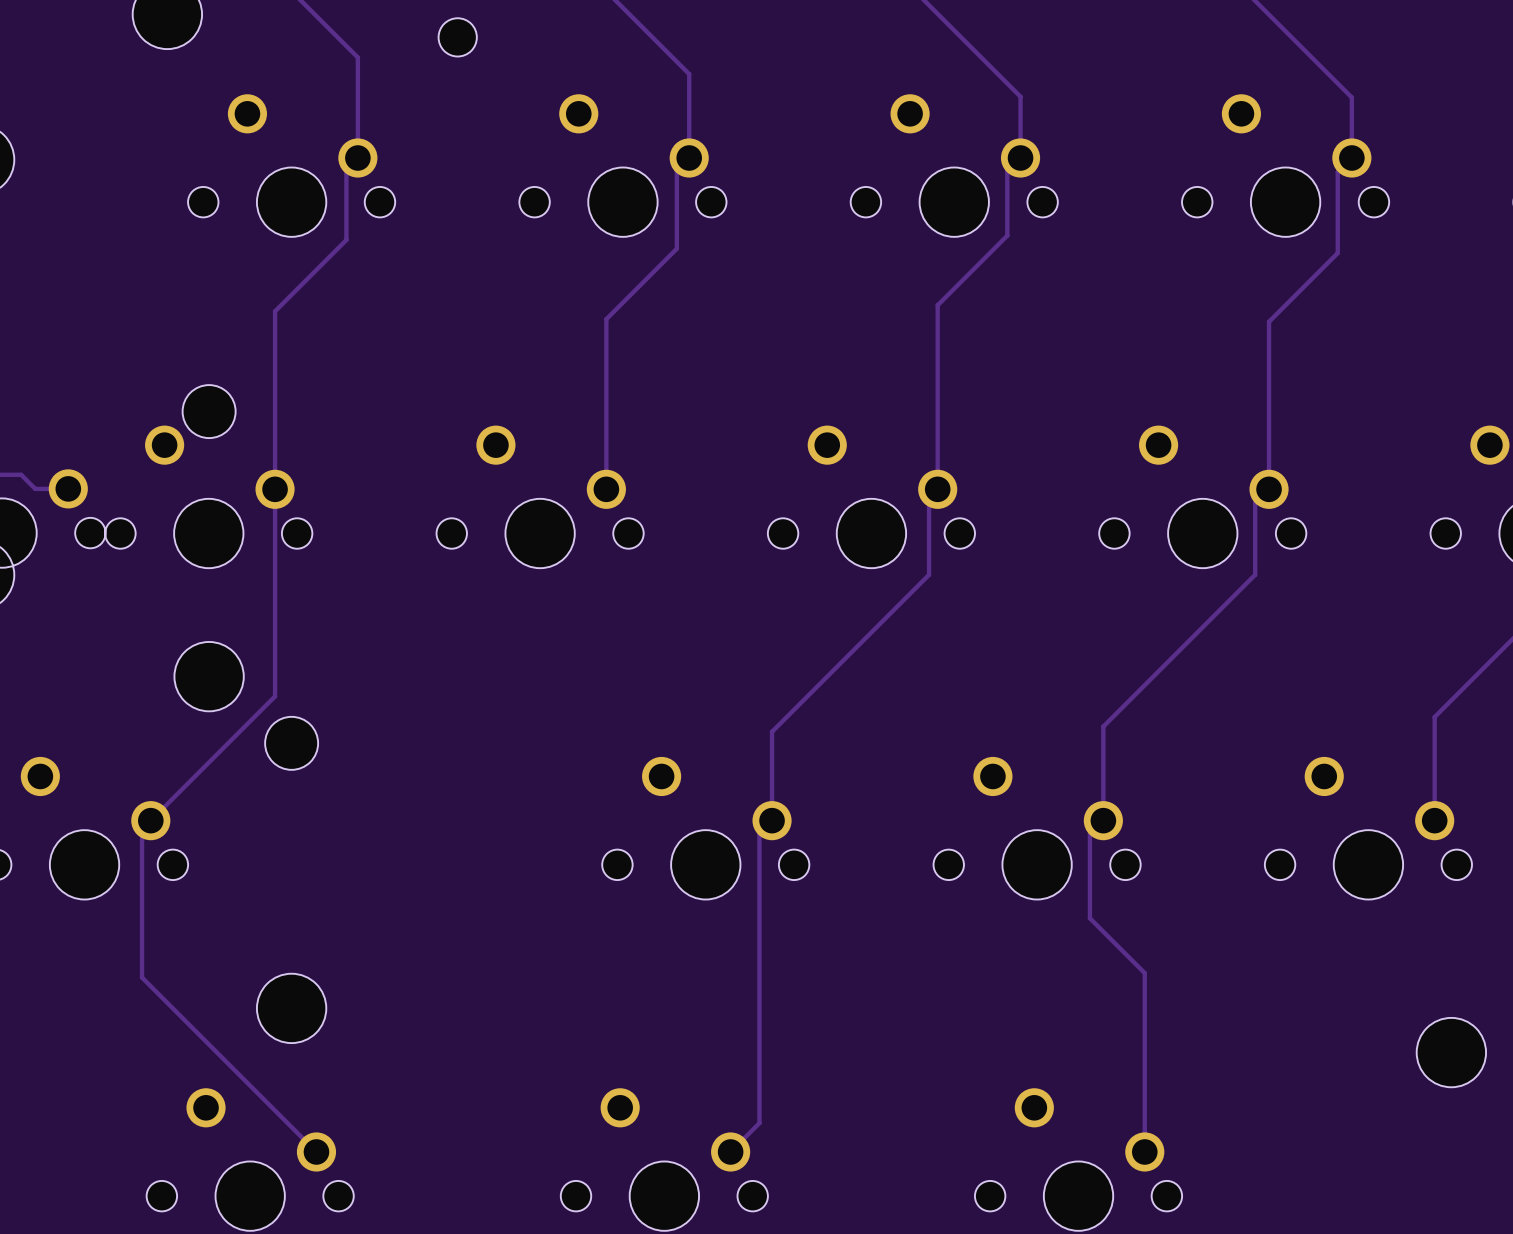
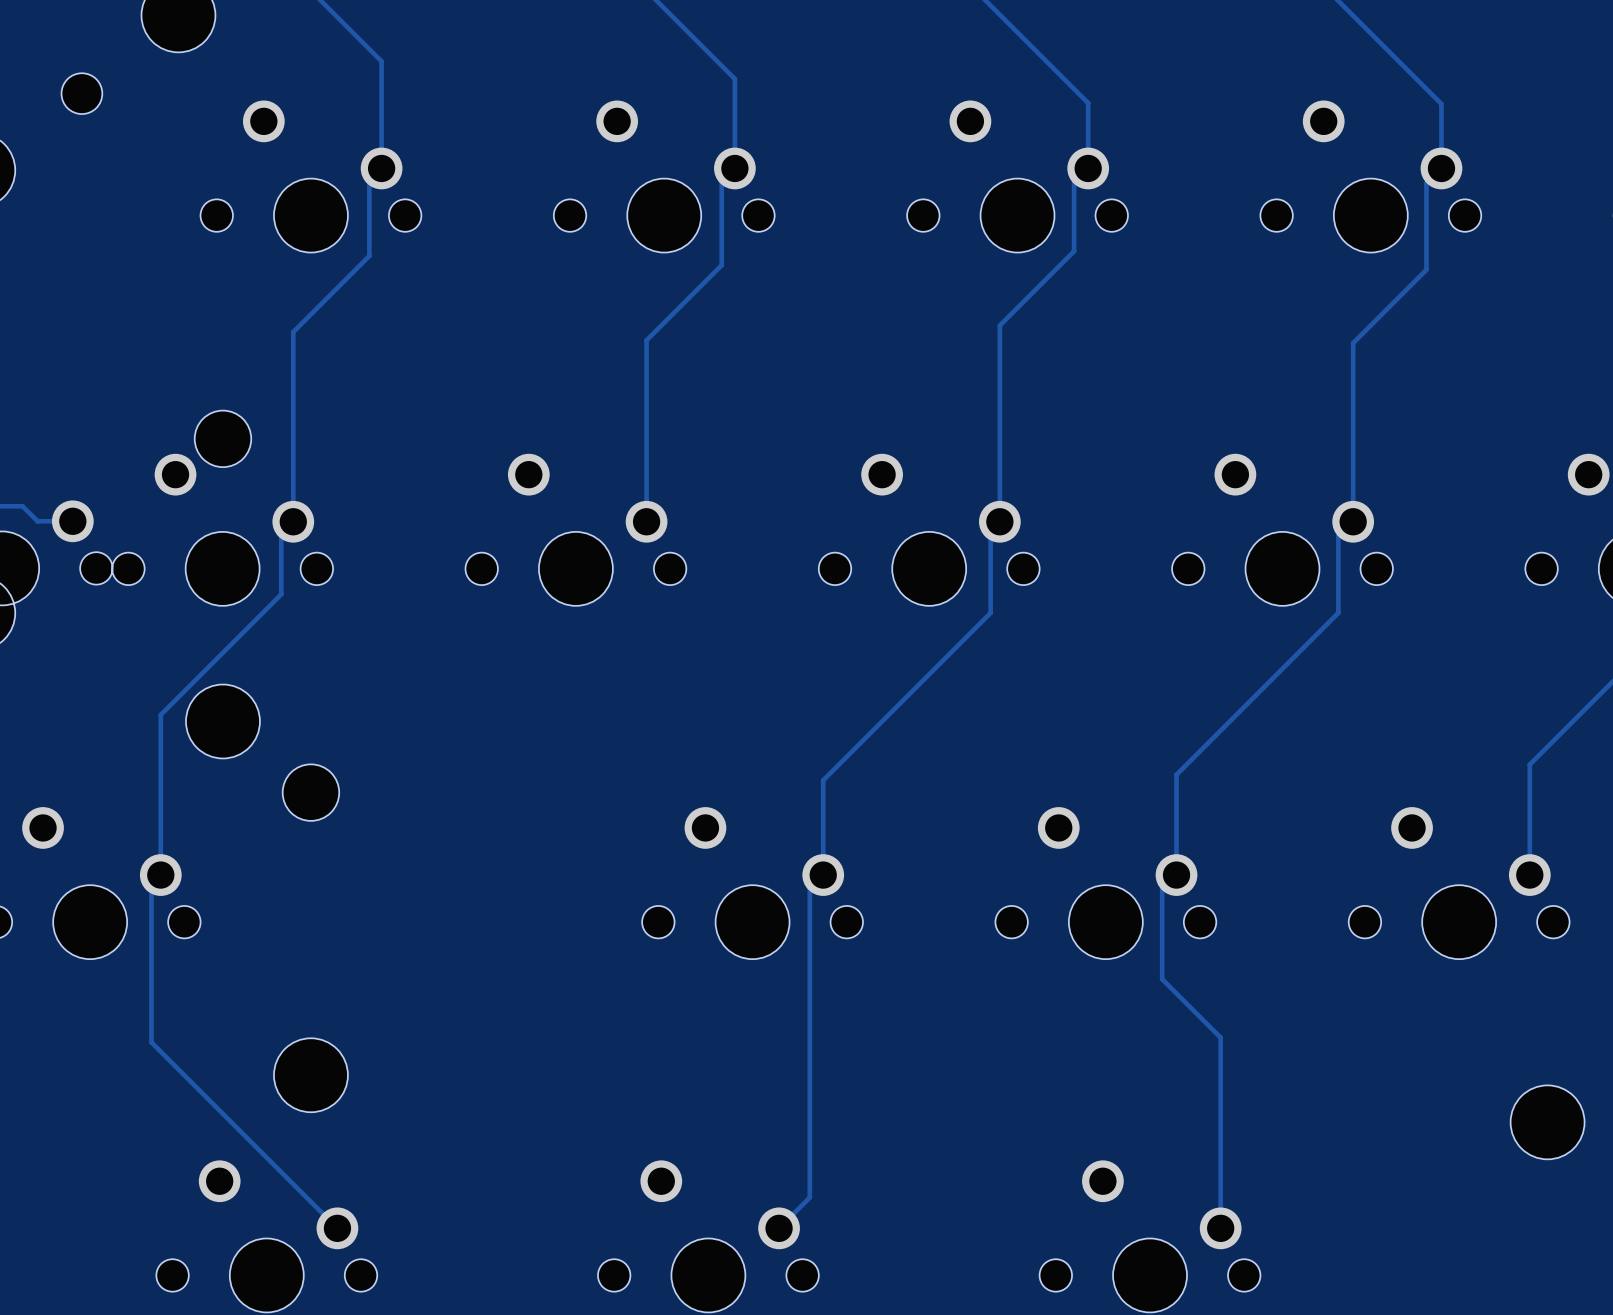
part position: (457, 37) -> (81, 93)
track: (275, 489) (275, 696) (150, 820) -> (293, 521) (281, 533) (281, 594) (160, 714) (160, 875)

